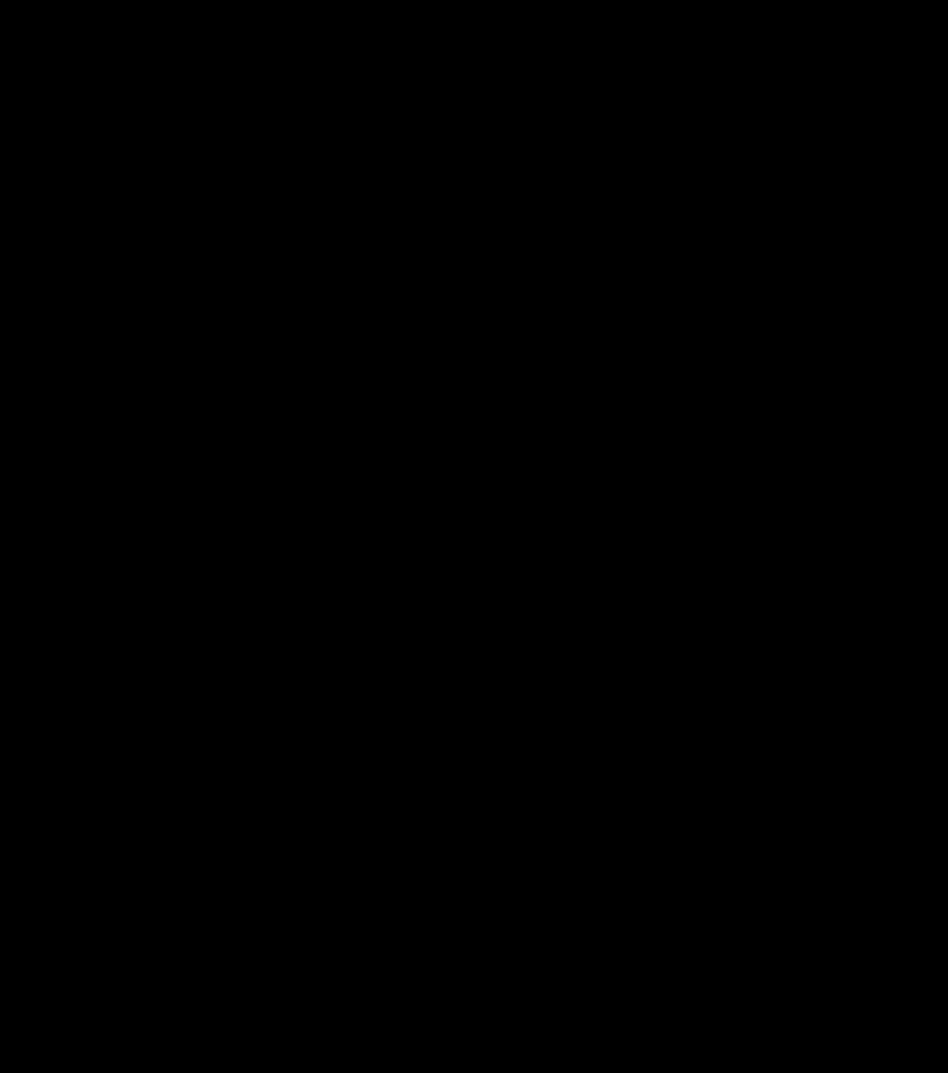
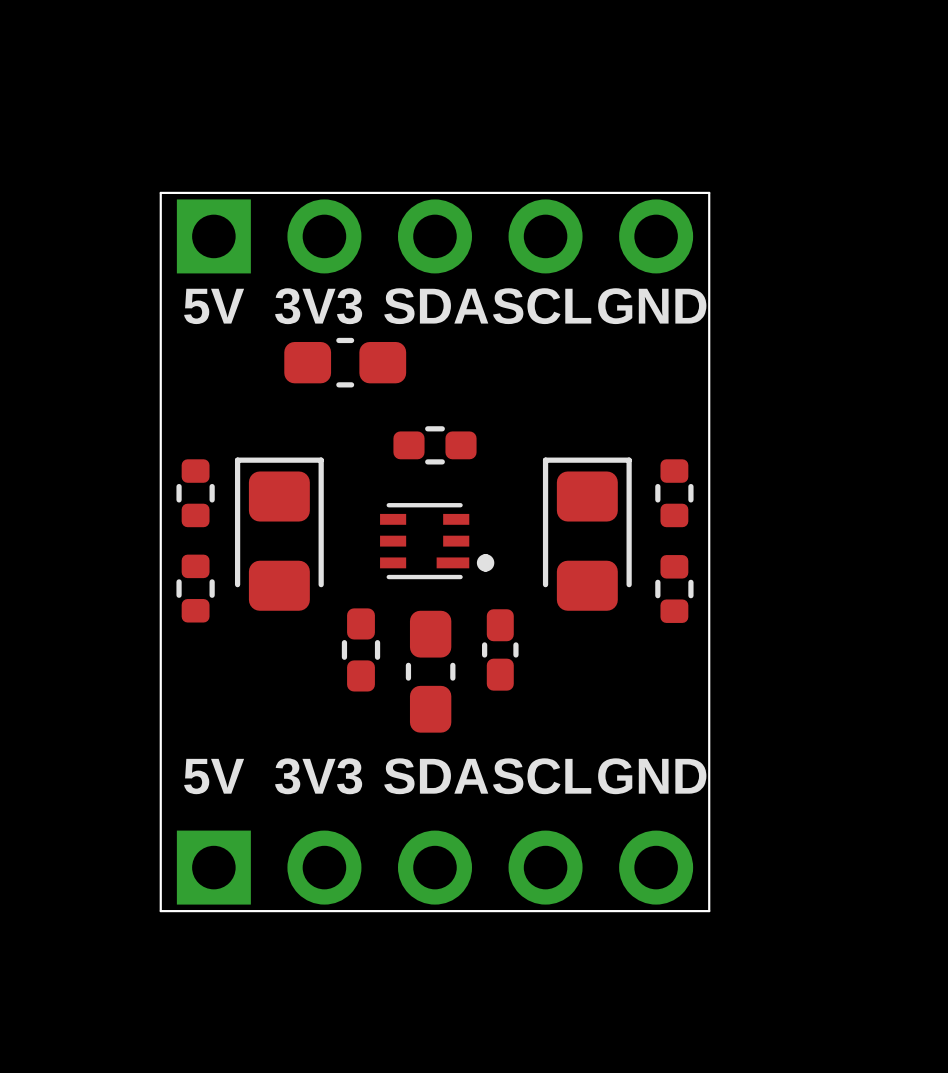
board edge: none -> (160, 192) (709, 192) (709, 911) (160, 911) (160, 192)
part: none -> (434, 236)
text: none -> 5V (214, 306)
text: none -> 3V3 (318, 306)
text: none -> SDA (436, 306)
text: none -> SCL (542, 306)
text: none -> GND (652, 306)
part: none -> (345, 362)
part: none -> (434, 445)
part: none -> (195, 493)
part: none -> (674, 493)
part: none -> (279, 534)
part: none -> (587, 534)
part: none -> (437, 541)
part: none -> (195, 588)
part: none -> (674, 589)
part: none -> (361, 649)
part: none -> (500, 649)
part: none -> (430, 671)
text: none -> 5V (214, 776)
text: none -> 3V3 (318, 776)
text: none -> SDA (436, 776)
text: none -> SCL (542, 776)
text: none -> GND (652, 776)
part: none -> (434, 867)

